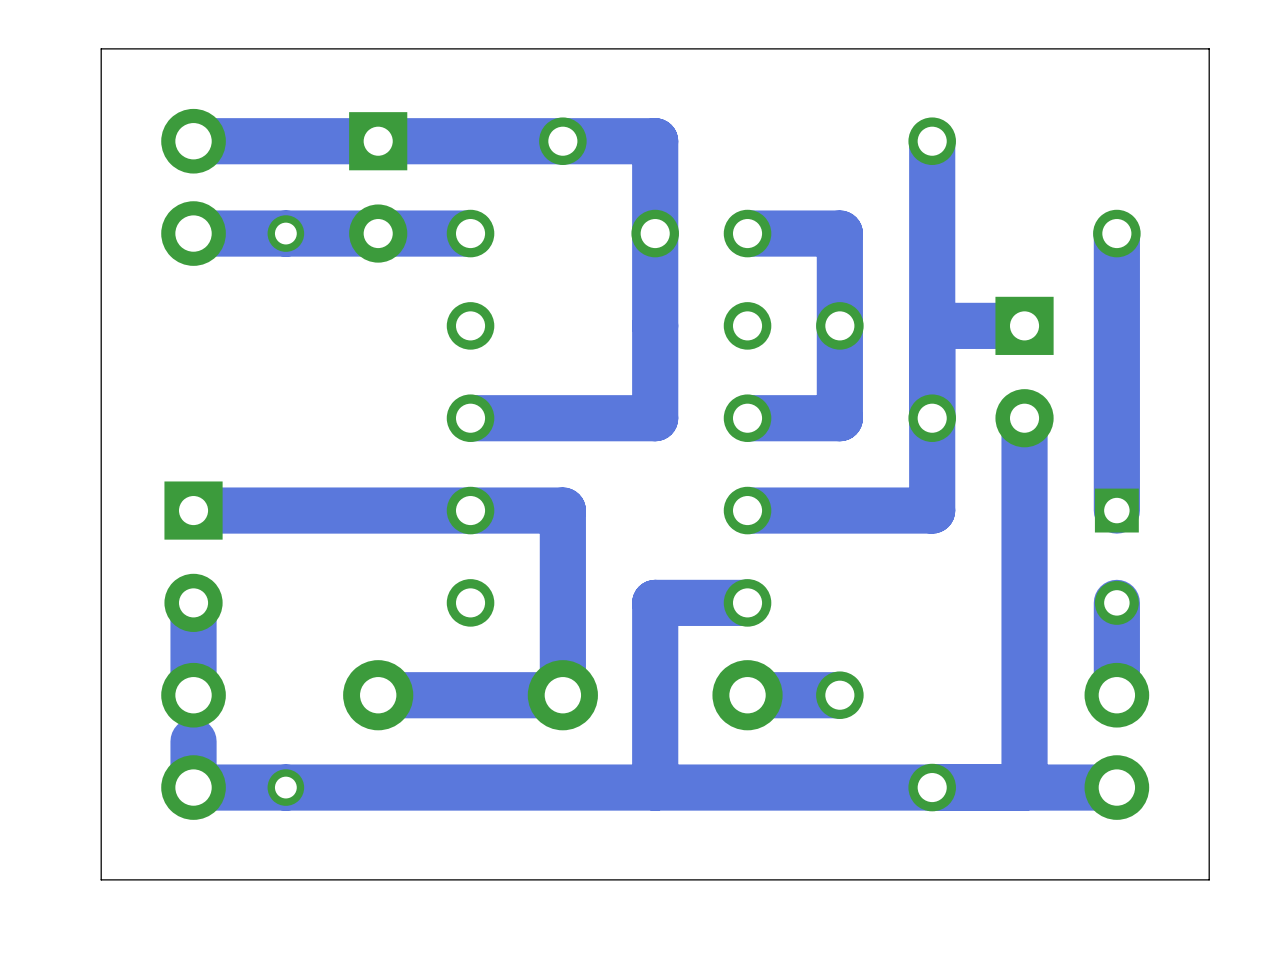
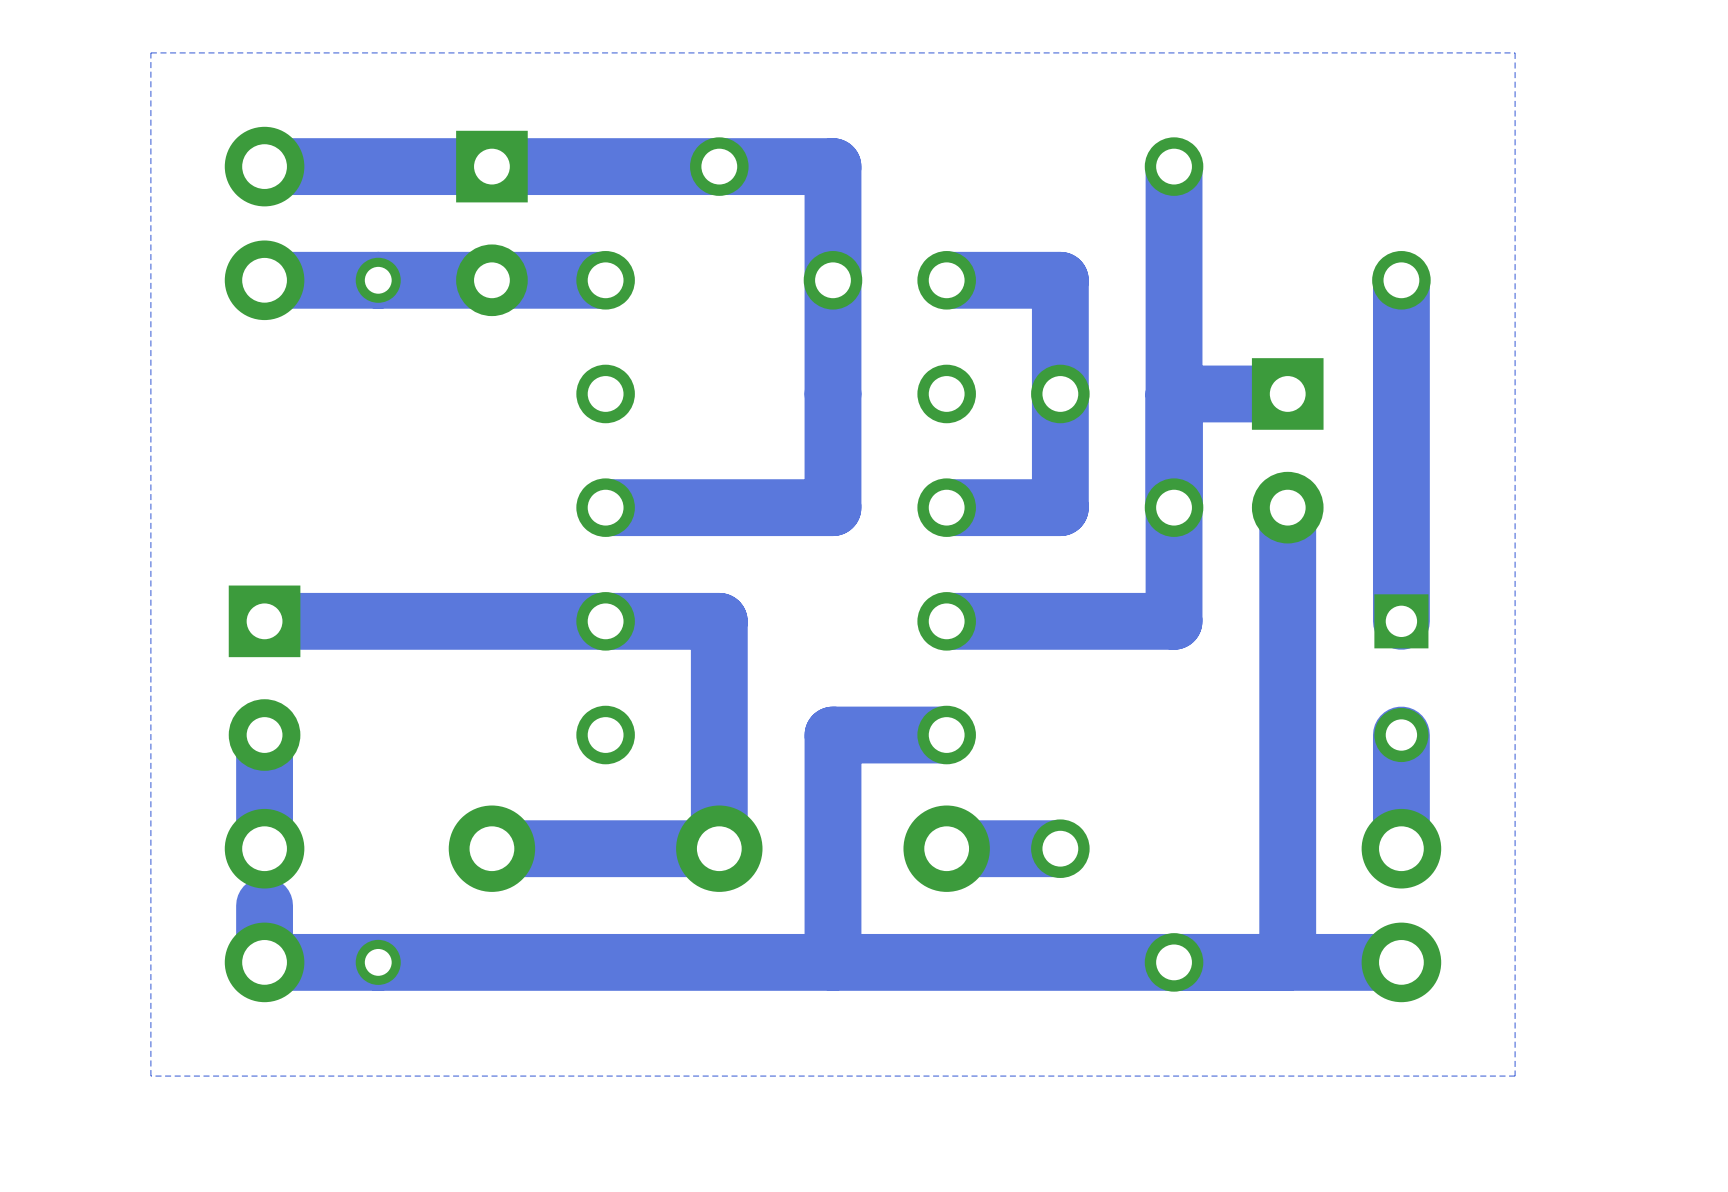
board edge: (1209, 48) (101, 48) (101, 879) (1209, 879) (1209, 48) -> none
zone outline: none -> (1515, 52) (150, 52) (150, 1076) (1515, 1076) (1515, 52)

